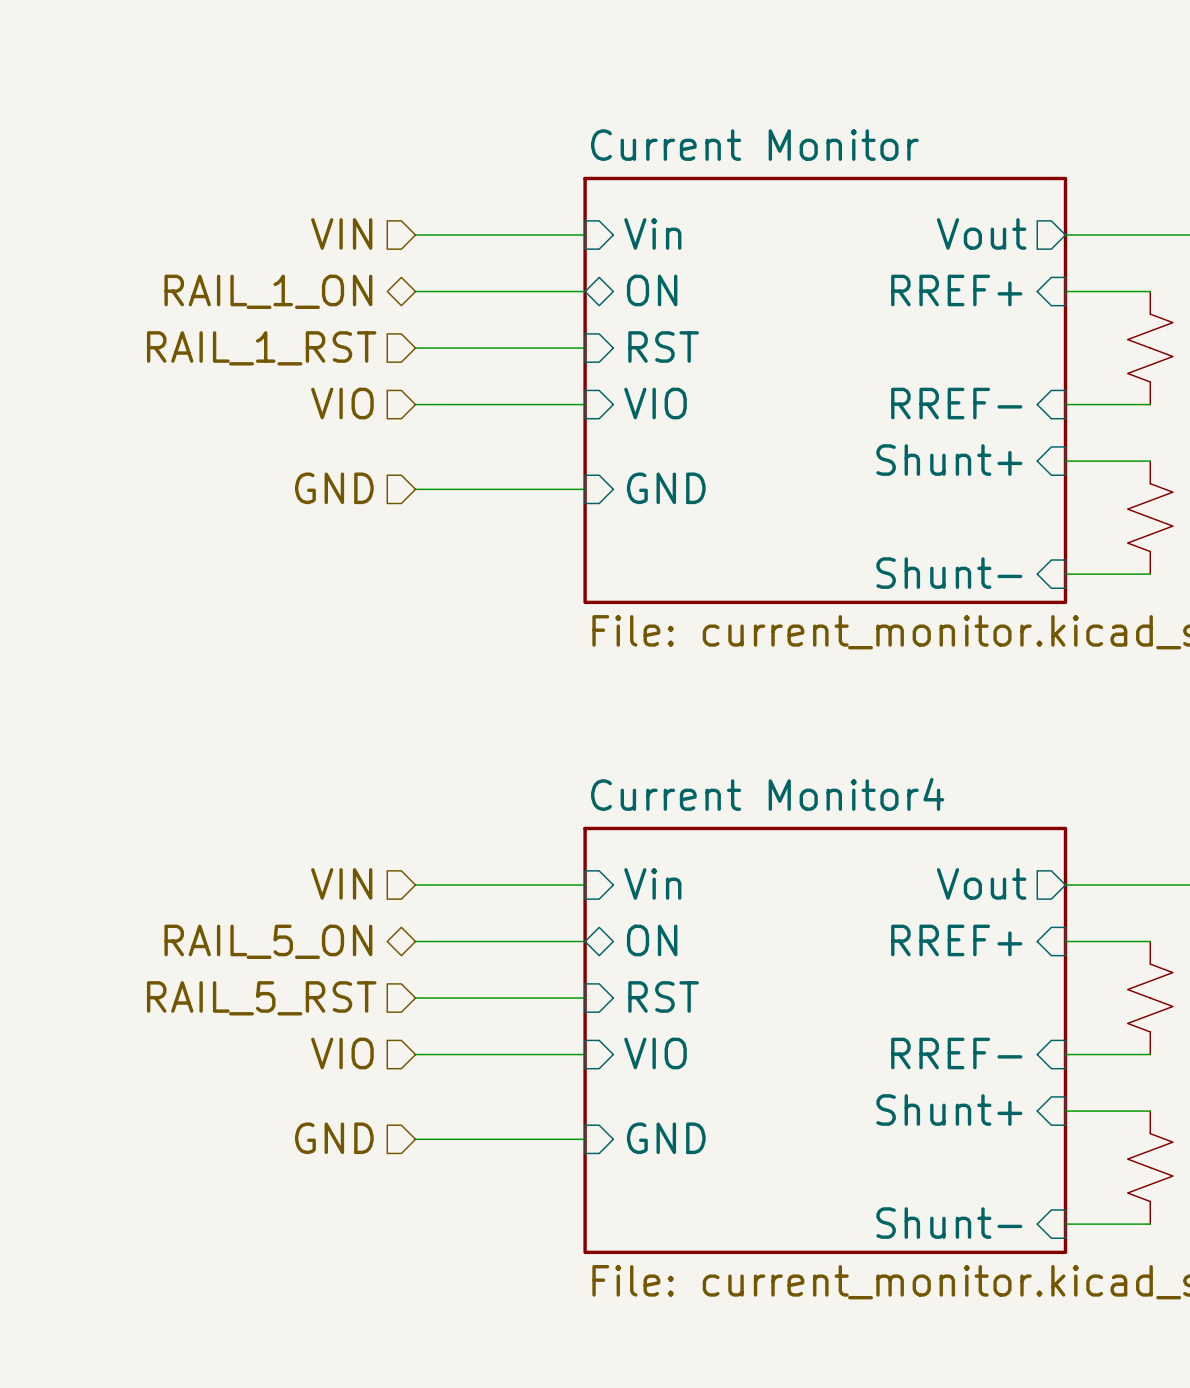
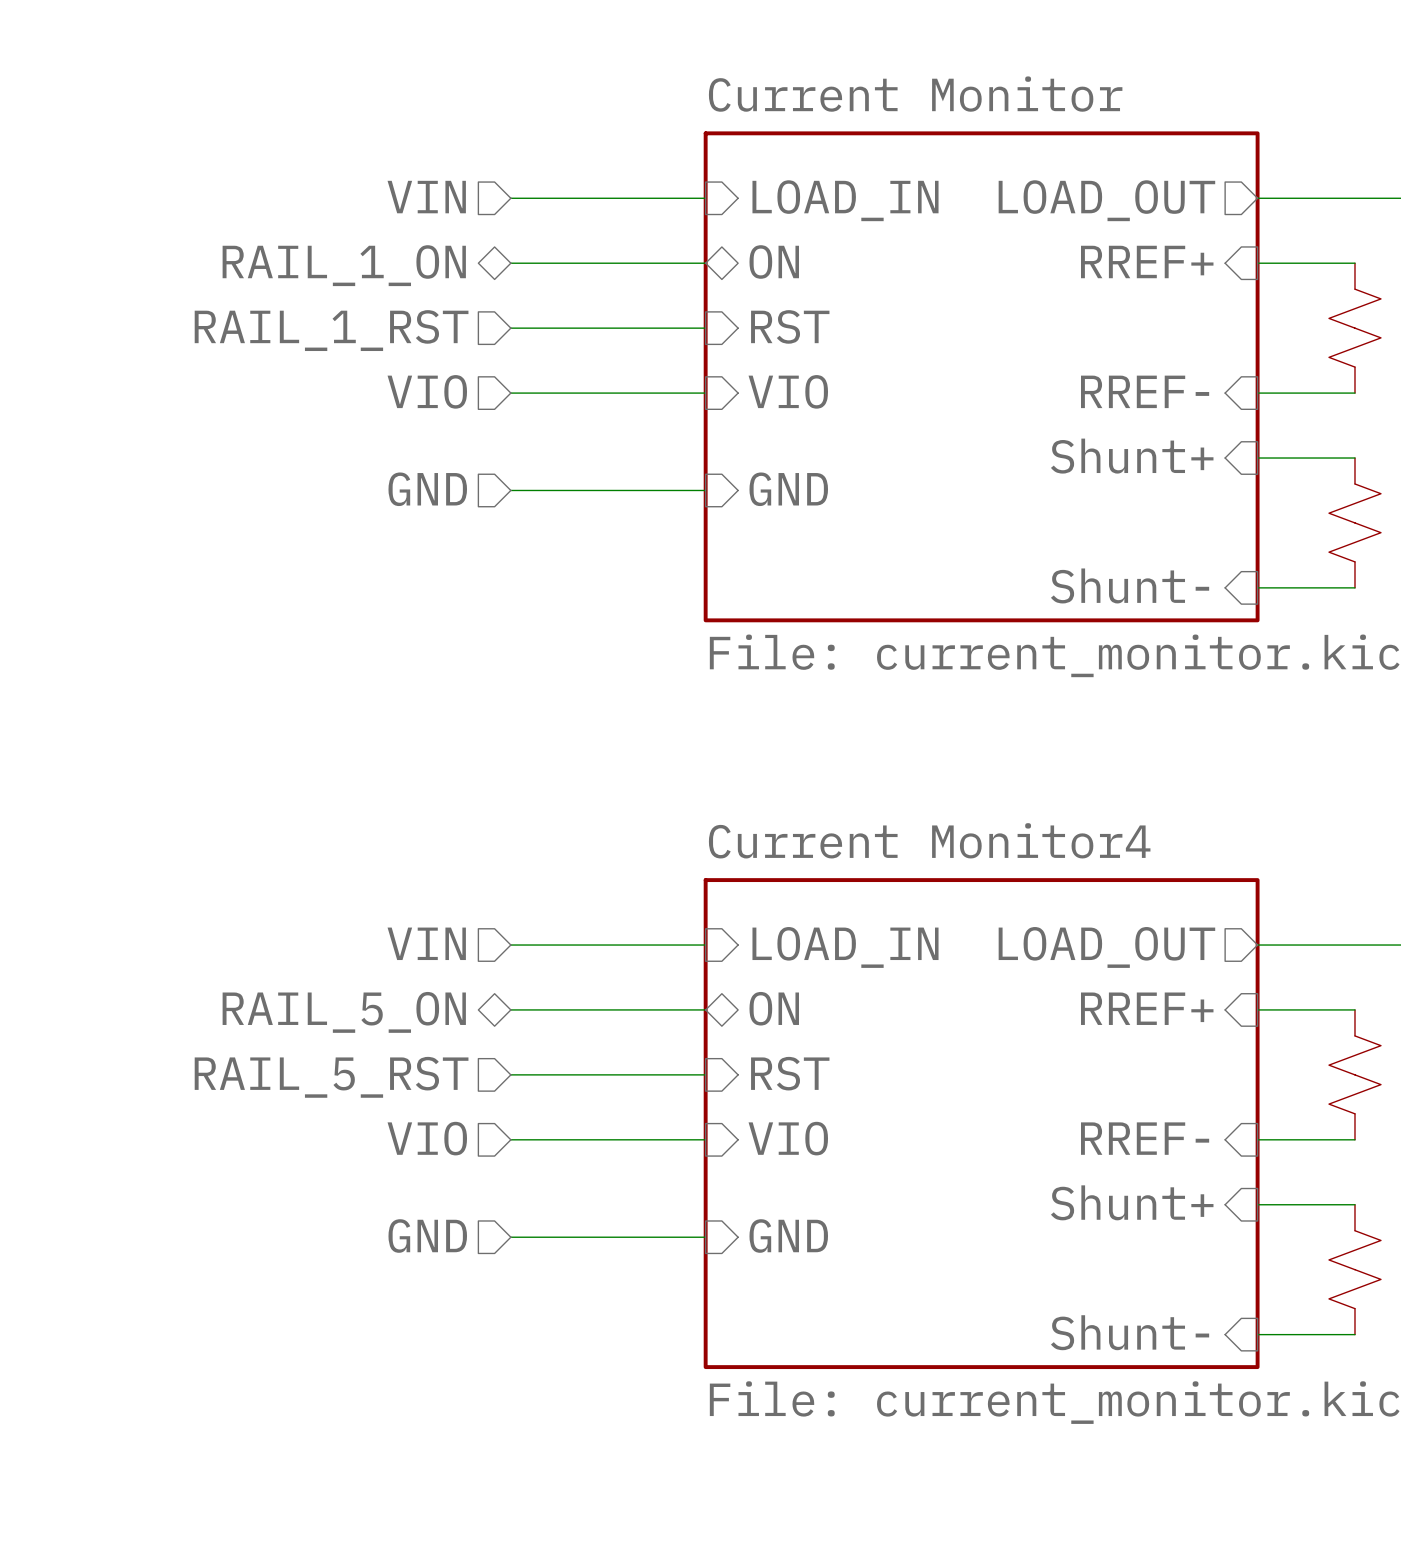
sheet pin: Vin (652, 233) -> LOAD_IN (845, 200)
sheet pin: Vout (981, 233) -> LOAD_OUT (1106, 200)
sheet pin: Vin (652, 883) -> LOAD_IN (845, 947)
sheet pin: Vout (981, 883) -> LOAD_OUT (1106, 947)

